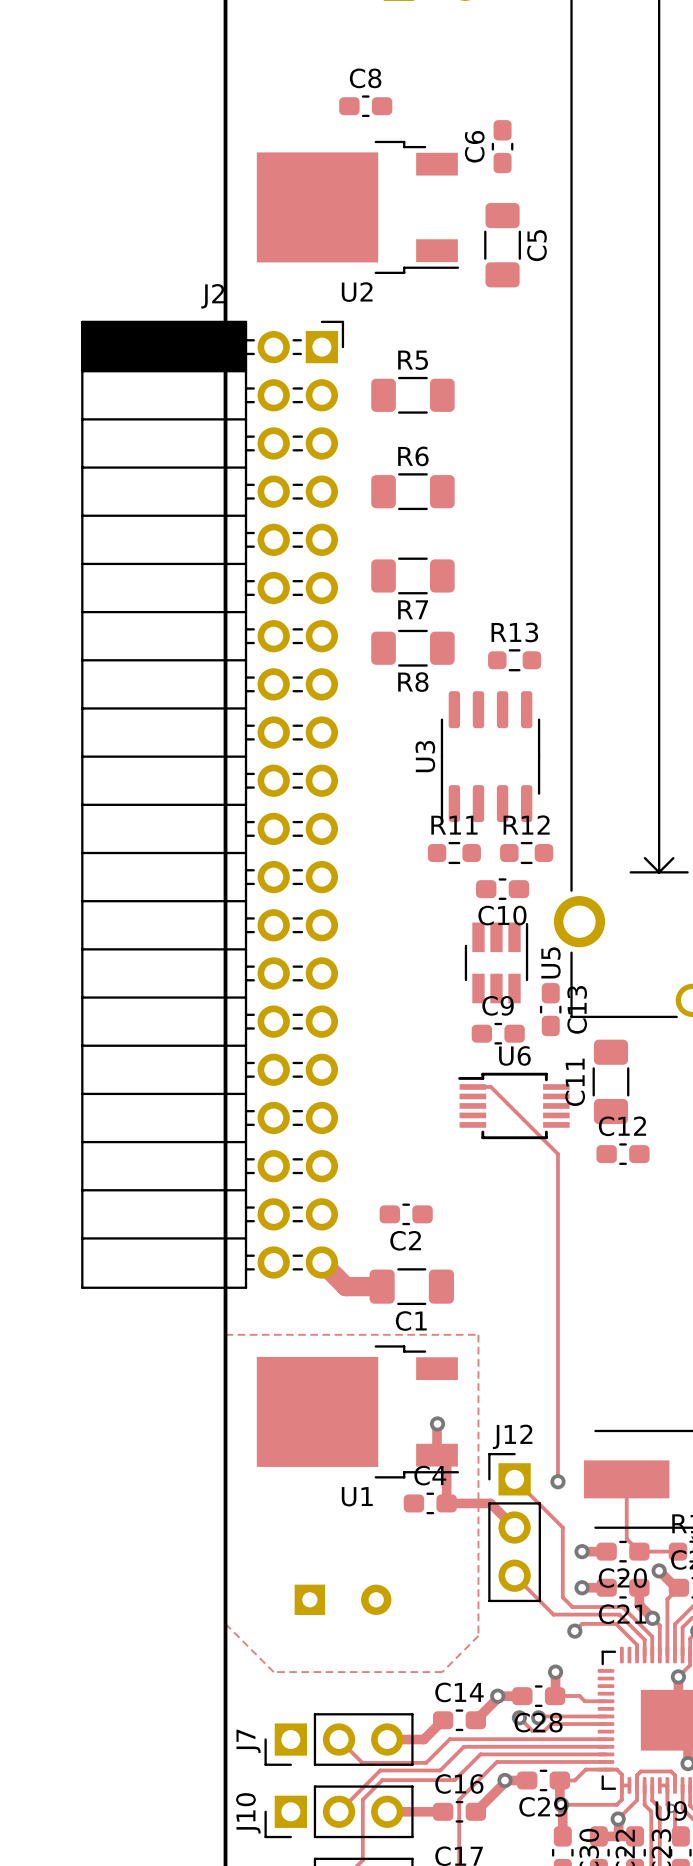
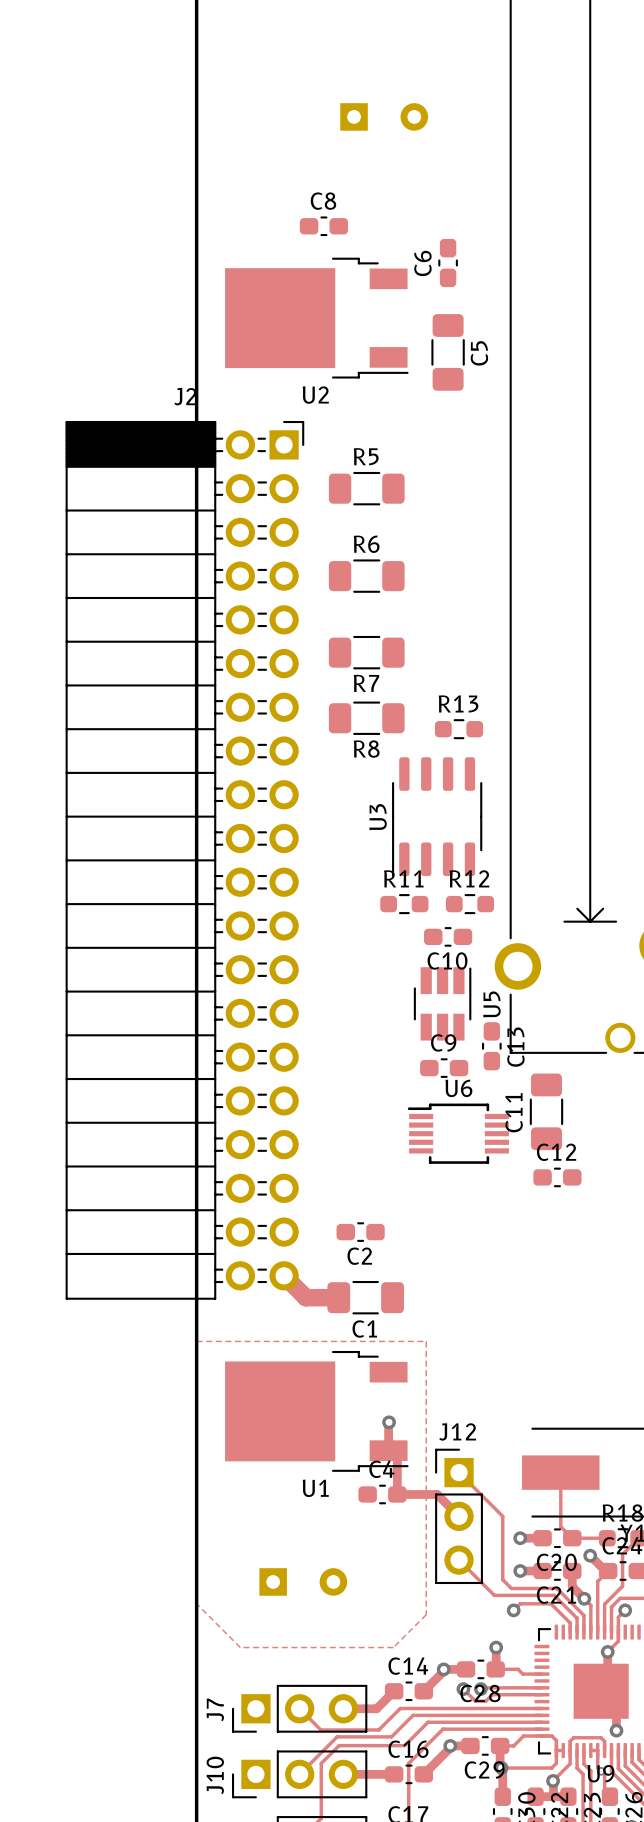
track: (472, 1086) (490, 1086) (557, 1154) (557, 1481) -> none
via: (557, 1481) -> none

